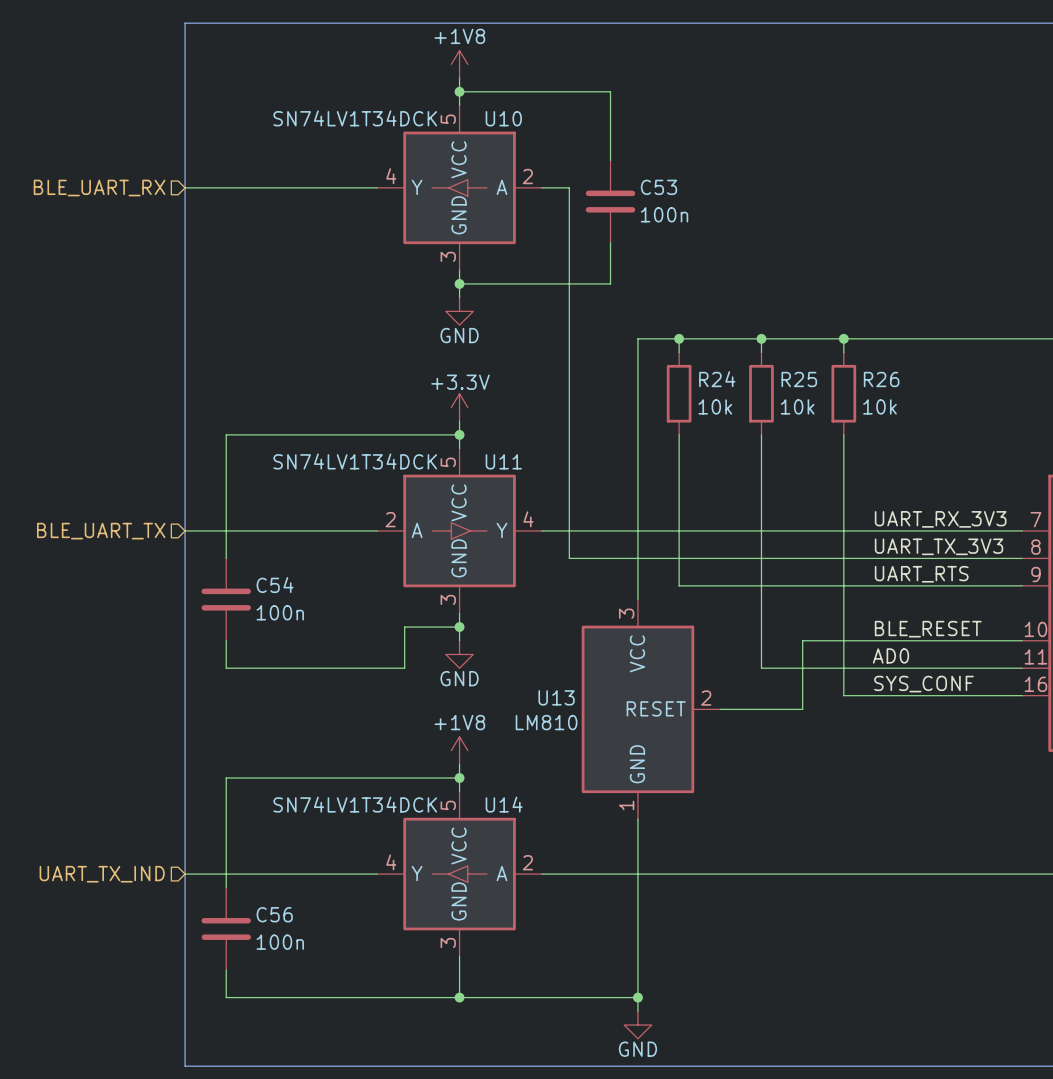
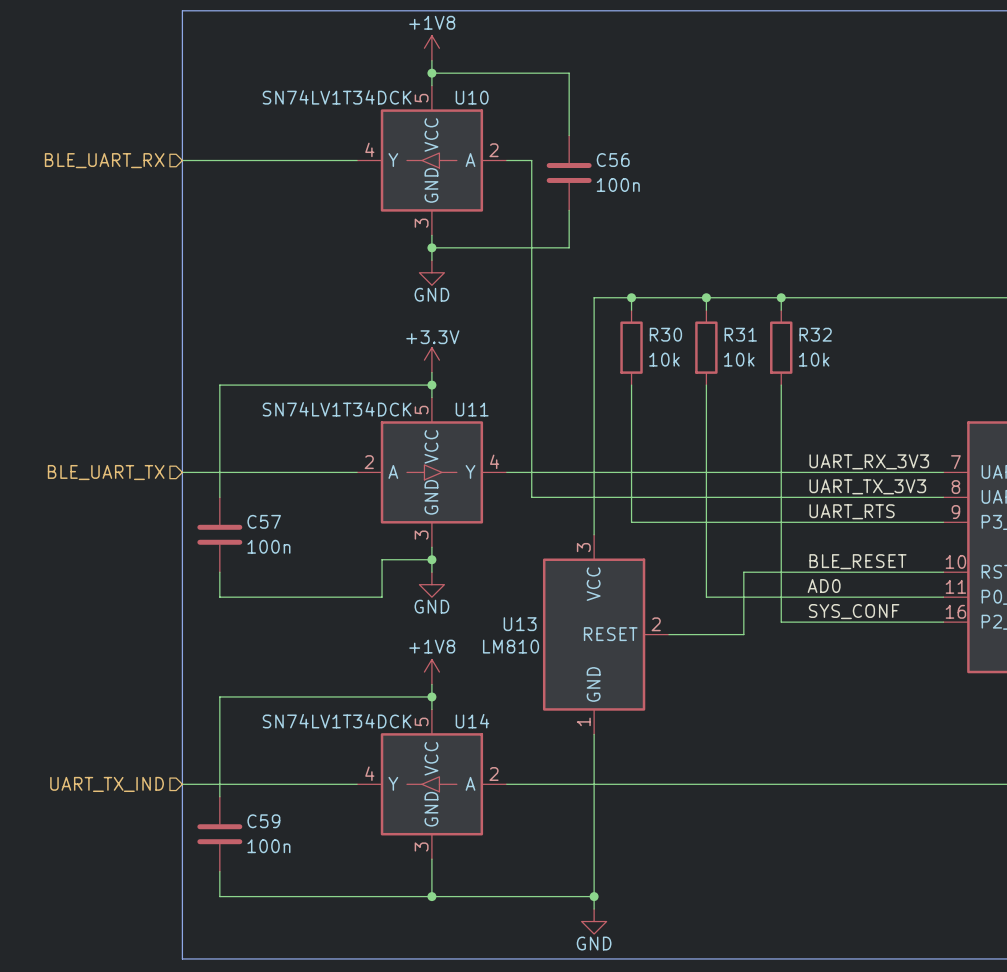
C53 name: C53 (658, 187) -> C56 (613, 160)
R24 name: R24 (717, 379) -> R30 (665, 334)
R25 name: R25 (799, 379) -> R31 (740, 334)
R26 name: R26 (881, 379) -> R32 (815, 334)
C54 name: C54 (275, 585) -> C57 (264, 521)
C56 name: C56 (274, 914) -> C59 (263, 821)

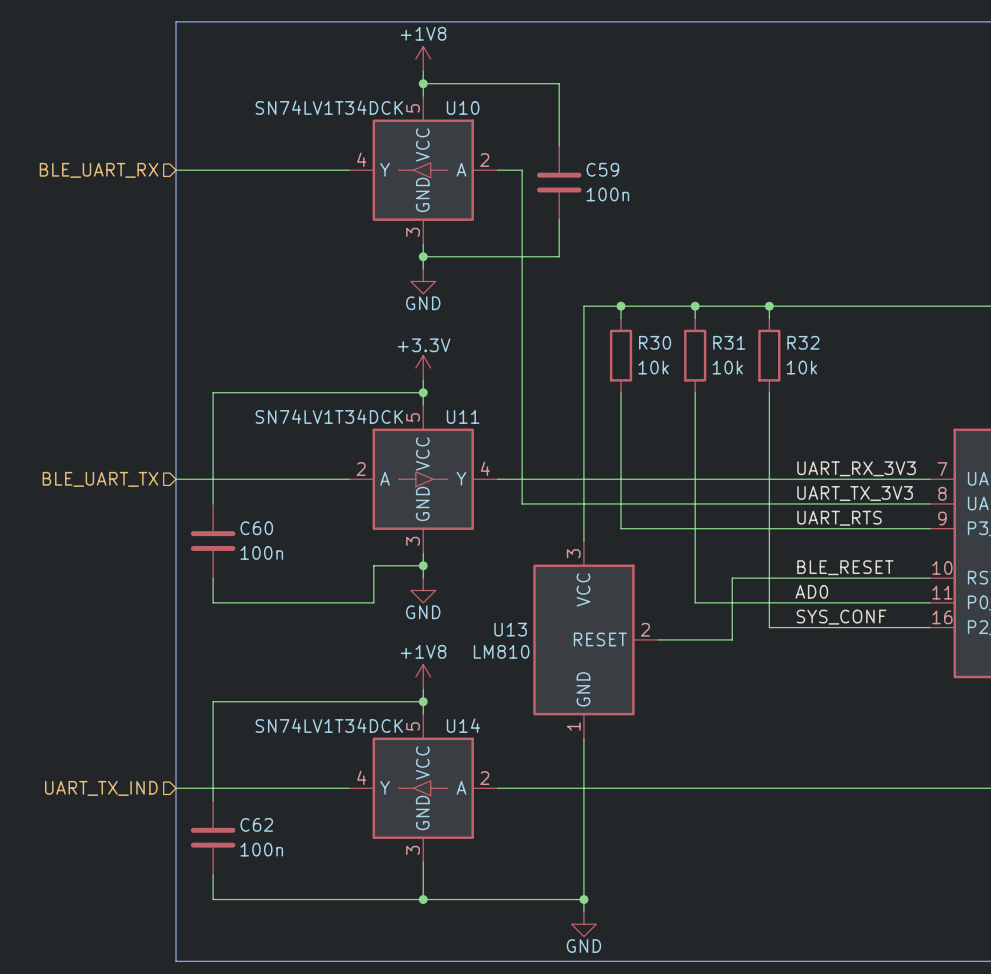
C56 name: C56 (613, 160) -> C59 (602, 169)
C57 name: C57 (264, 521) -> C60 (256, 528)
C59 name: C59 (263, 821) -> C62 (256, 824)

